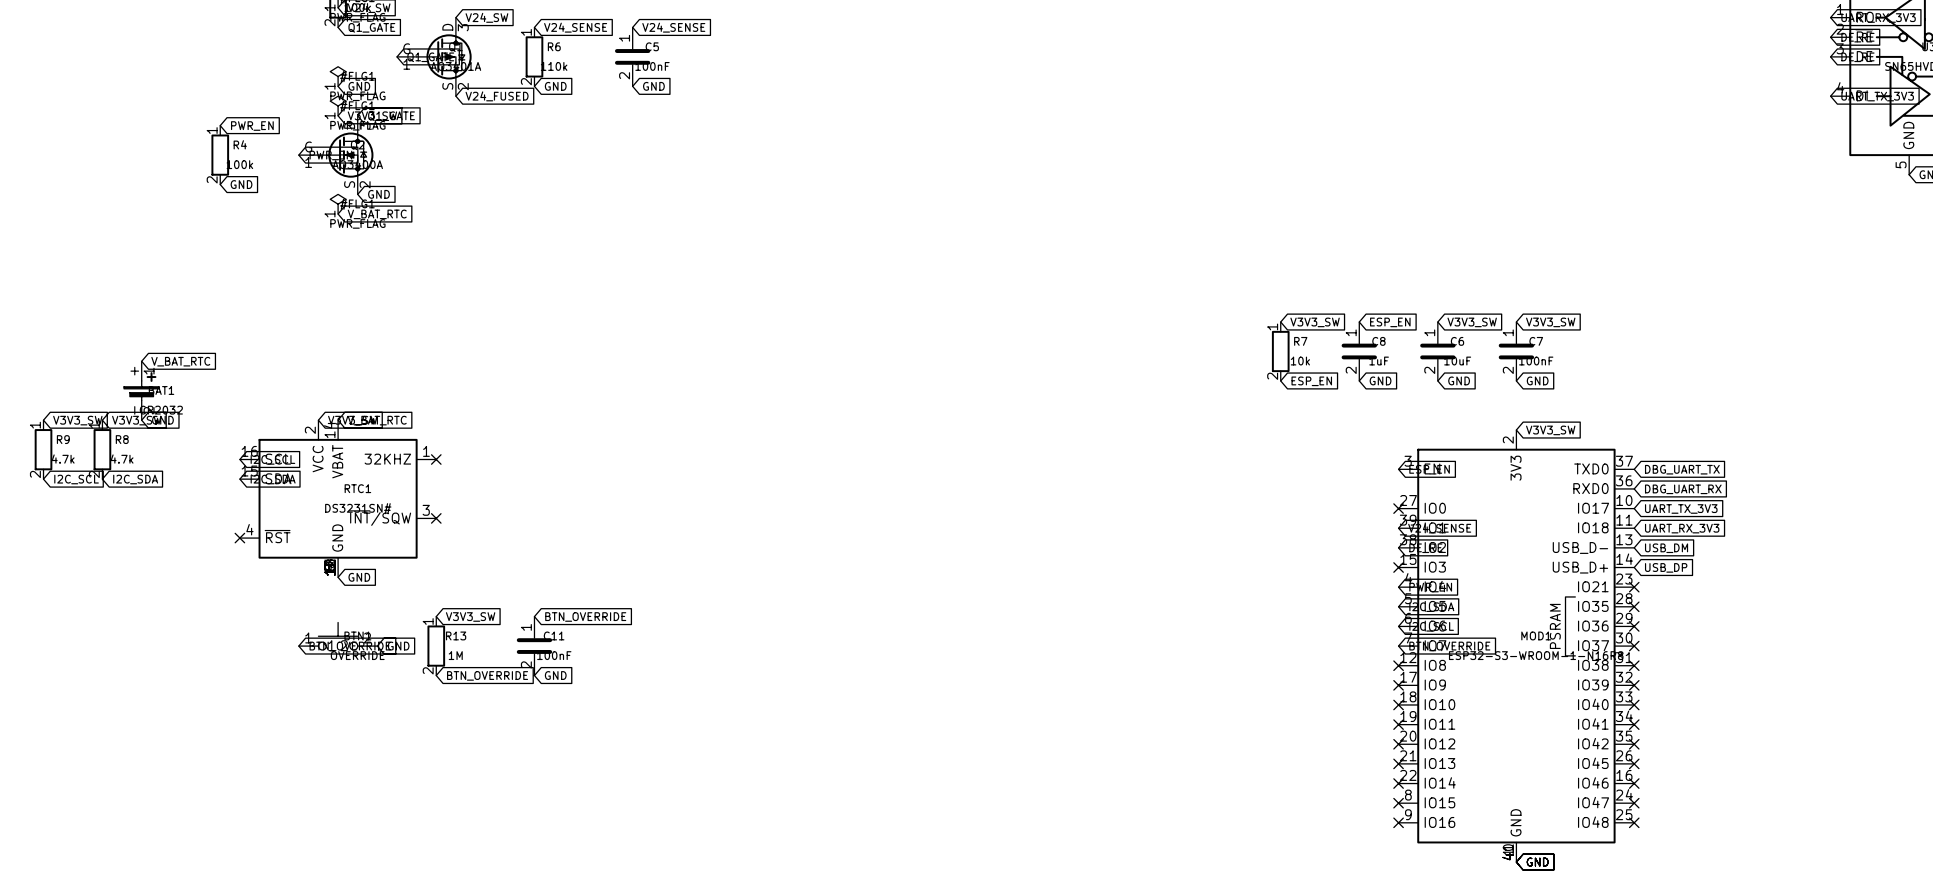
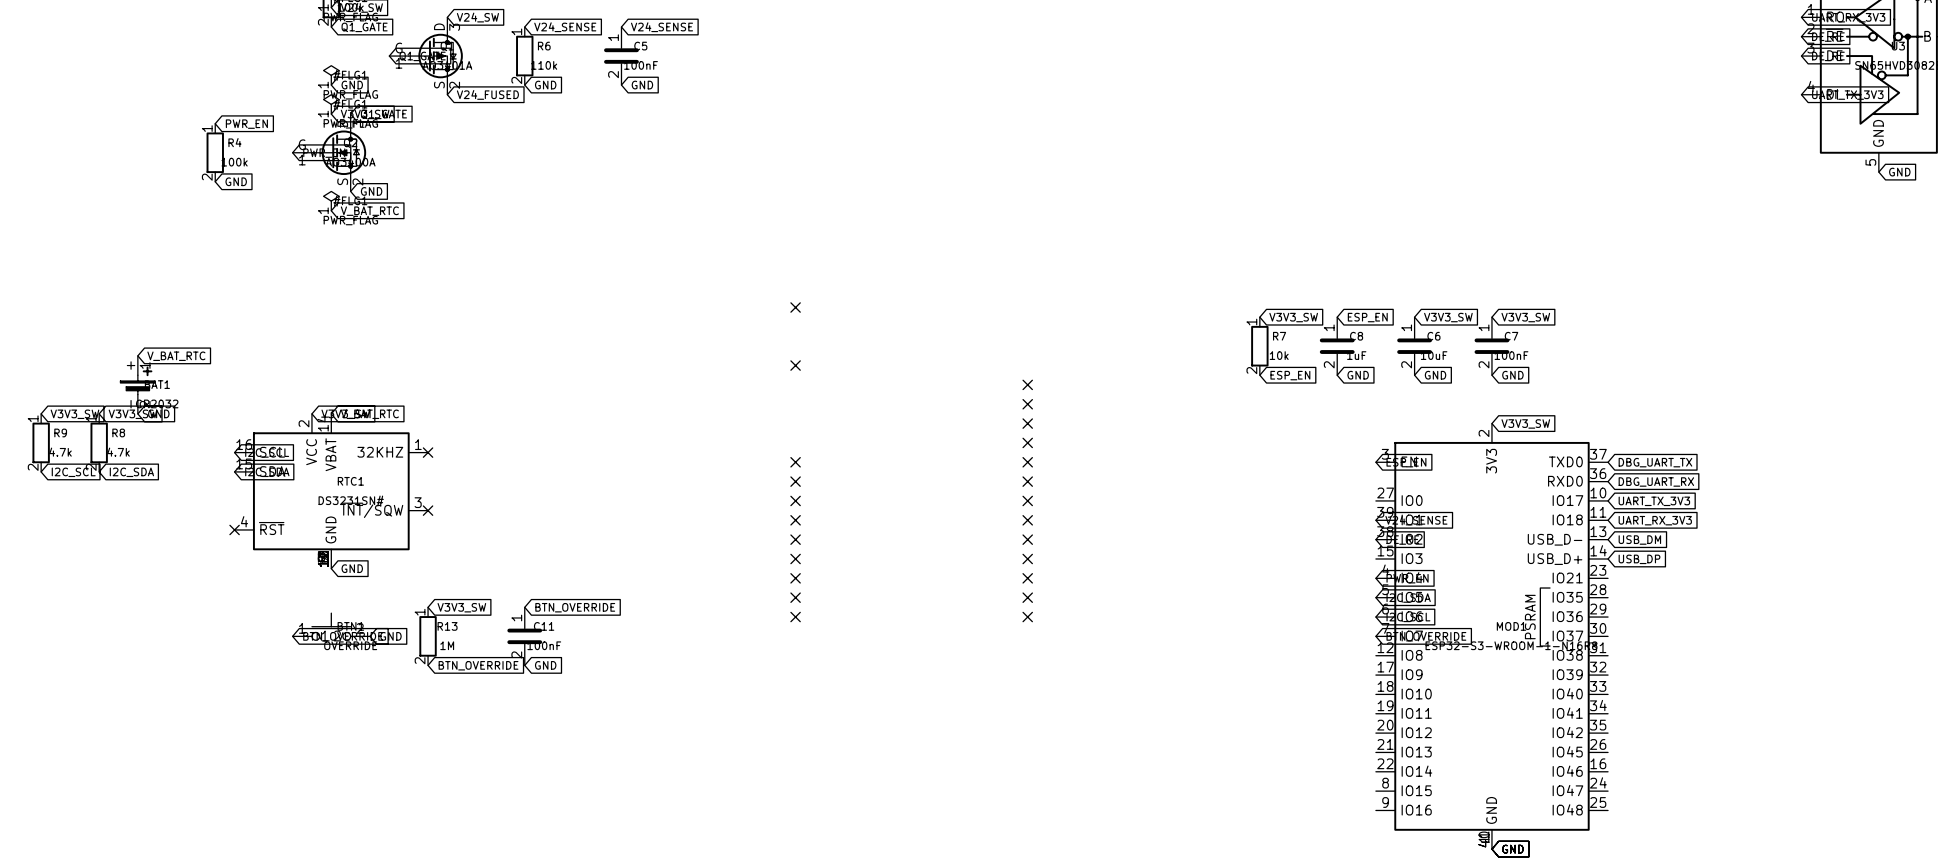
no-connect mark: none -> (795, 307)
no-connect mark: none -> (795, 365)
no-connect mark: none -> (1027, 384)
no-connect mark: none -> (1027, 404)
no-connect mark: none -> (1027, 423)
no-connect mark: none -> (1027, 442)
no-connect mark: none -> (795, 462)
no-connect mark: none -> (1027, 462)
no-connect mark: none -> (795, 481)
no-connect mark: none -> (1027, 481)
no-connect mark: none -> (795, 500)
no-connect mark: none -> (1027, 500)
no-connect mark: (1398, 508) -> none
no-connect mark: none -> (795, 520)
no-connect mark: none -> (1027, 520)
no-connect mark: none -> (795, 539)
no-connect mark: none -> (1027, 539)
no-connect mark: none -> (795, 558)
no-connect mark: none -> (1027, 558)
no-connect mark: (1398, 567) -> none
no-connect mark: none -> (795, 578)
no-connect mark: none -> (1027, 578)
no-connect mark: (1634, 587) -> none
no-connect mark: none -> (795, 597)
no-connect mark: none -> (1027, 597)
no-connect mark: (1634, 606) -> none
no-connect mark: none -> (795, 617)
no-connect mark: none -> (1027, 617)
no-connect mark: (1634, 626) -> none
no-connect mark: (1634, 646) -> none
no-connect mark: (1398, 665) -> none
no-connect mark: (1634, 665) -> none
no-connect mark: (1398, 685) -> none
no-connect mark: (1634, 685) -> none
no-connect mark: (1398, 704) -> none
no-connect mark: (1634, 704) -> none
no-connect mark: (1398, 724) -> none
no-connect mark: (1634, 724) -> none
no-connect mark: (1398, 744) -> none
no-connect mark: (1634, 744) -> none
no-connect mark: (1398, 763) -> none
no-connect mark: (1634, 763) -> none
no-connect mark: (1398, 783) -> none
no-connect mark: (1634, 783) -> none
no-connect mark: (1398, 803) -> none
no-connect mark: (1634, 803) -> none
no-connect mark: (1398, 822) -> none
no-connect mark: (1634, 822) -> none

